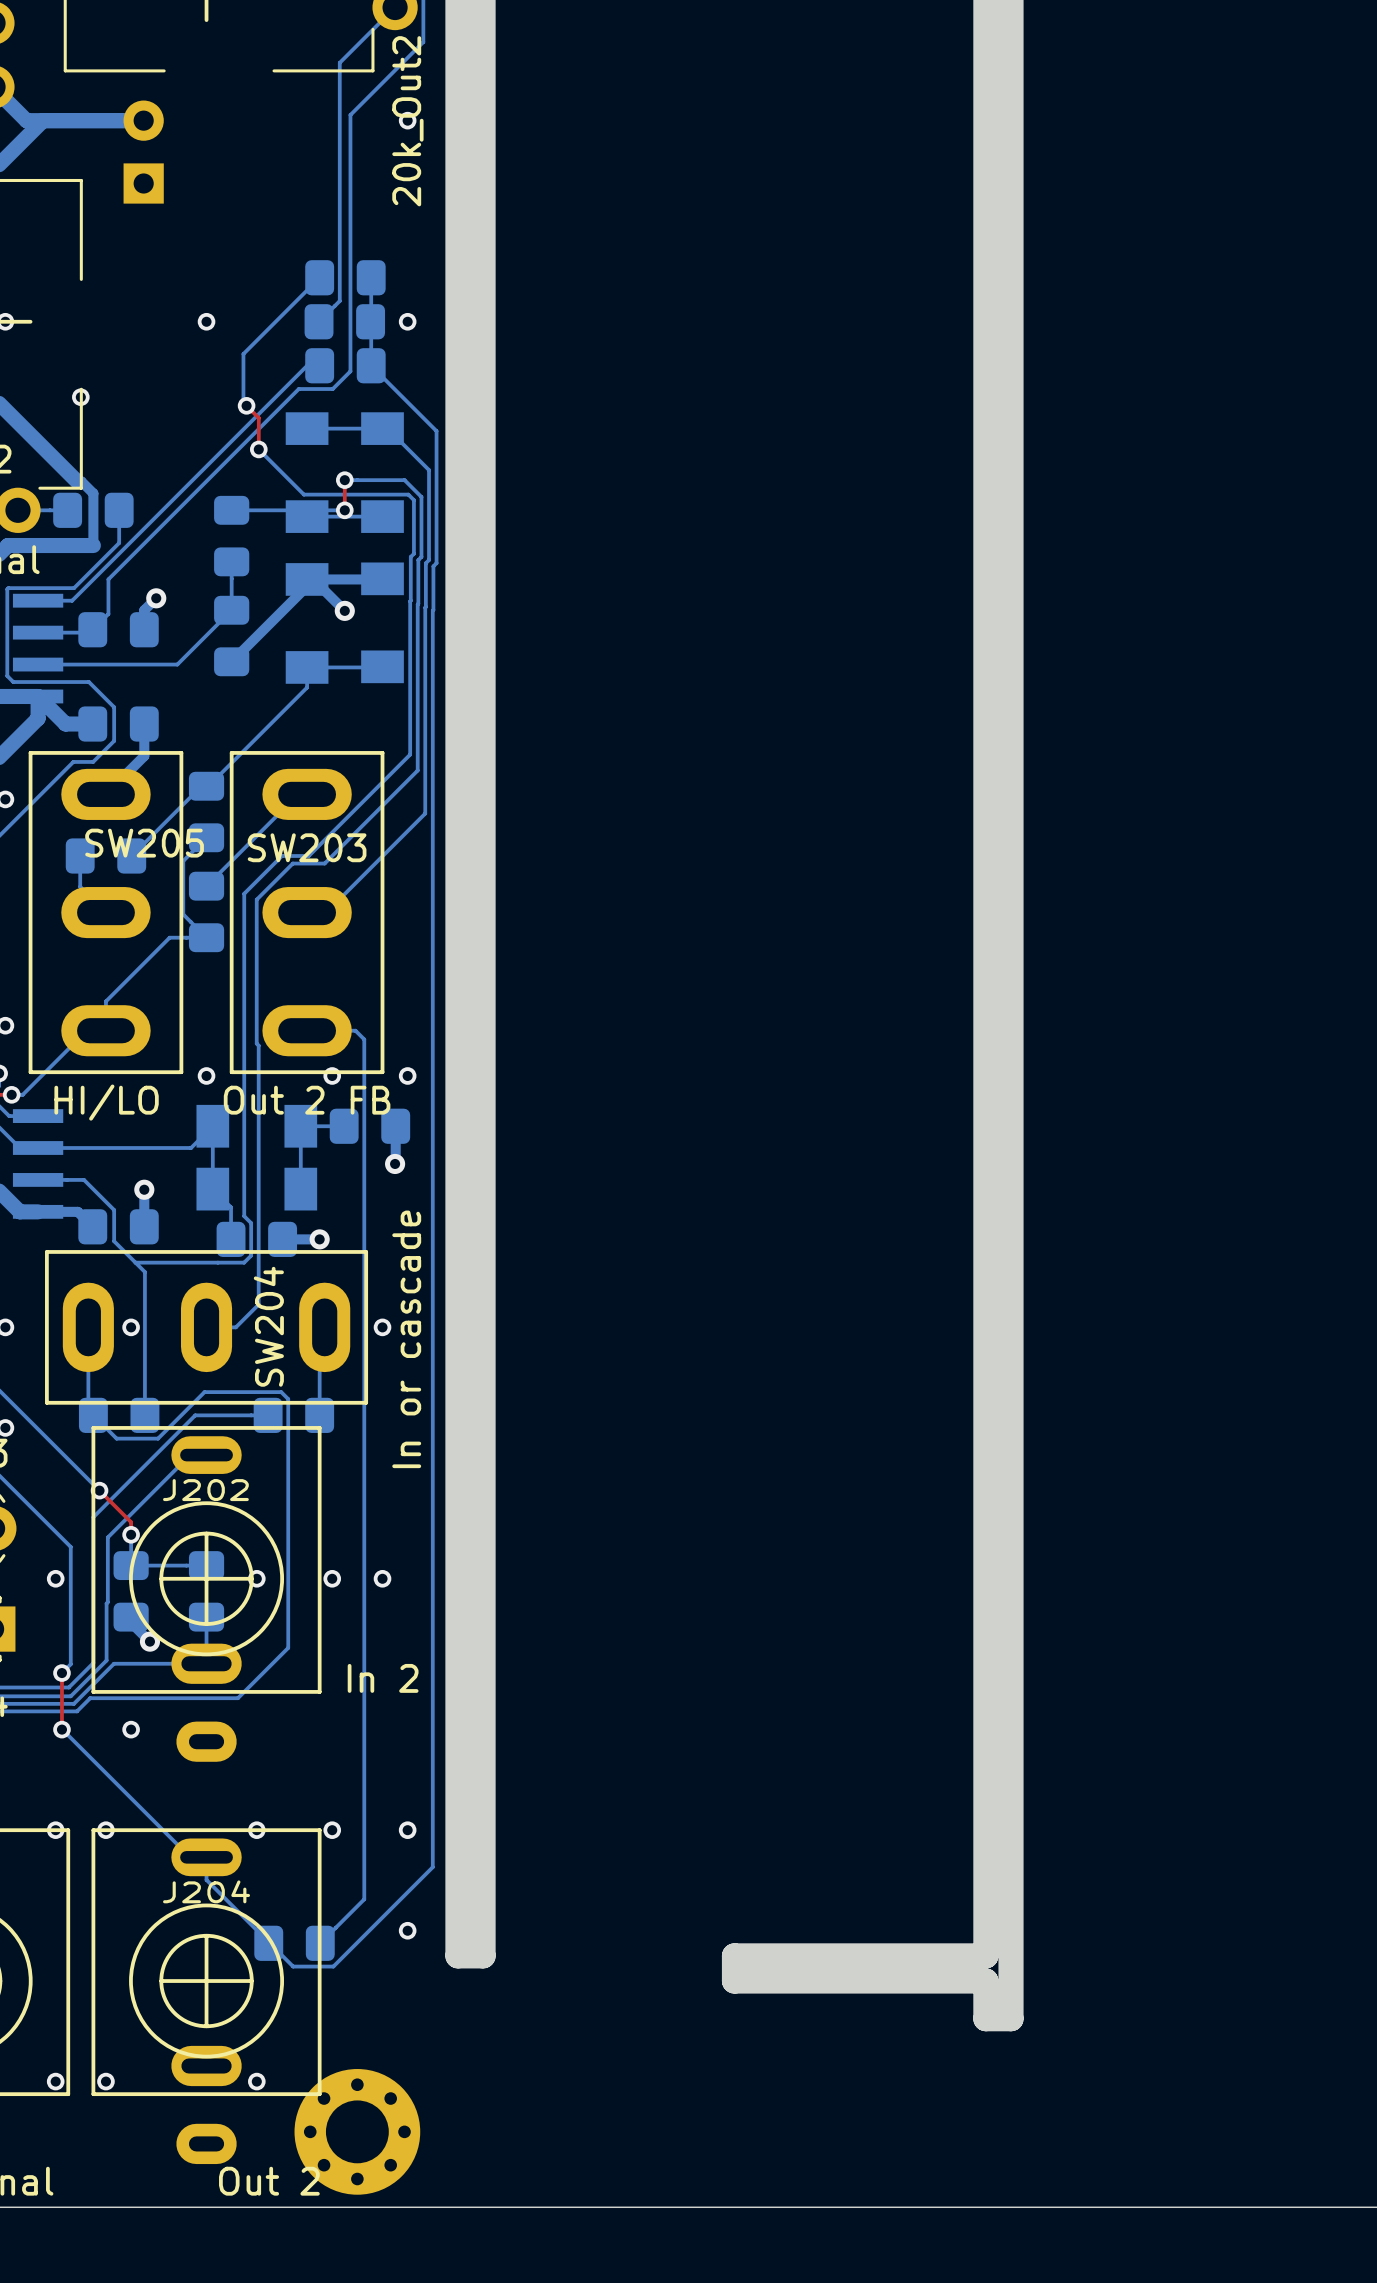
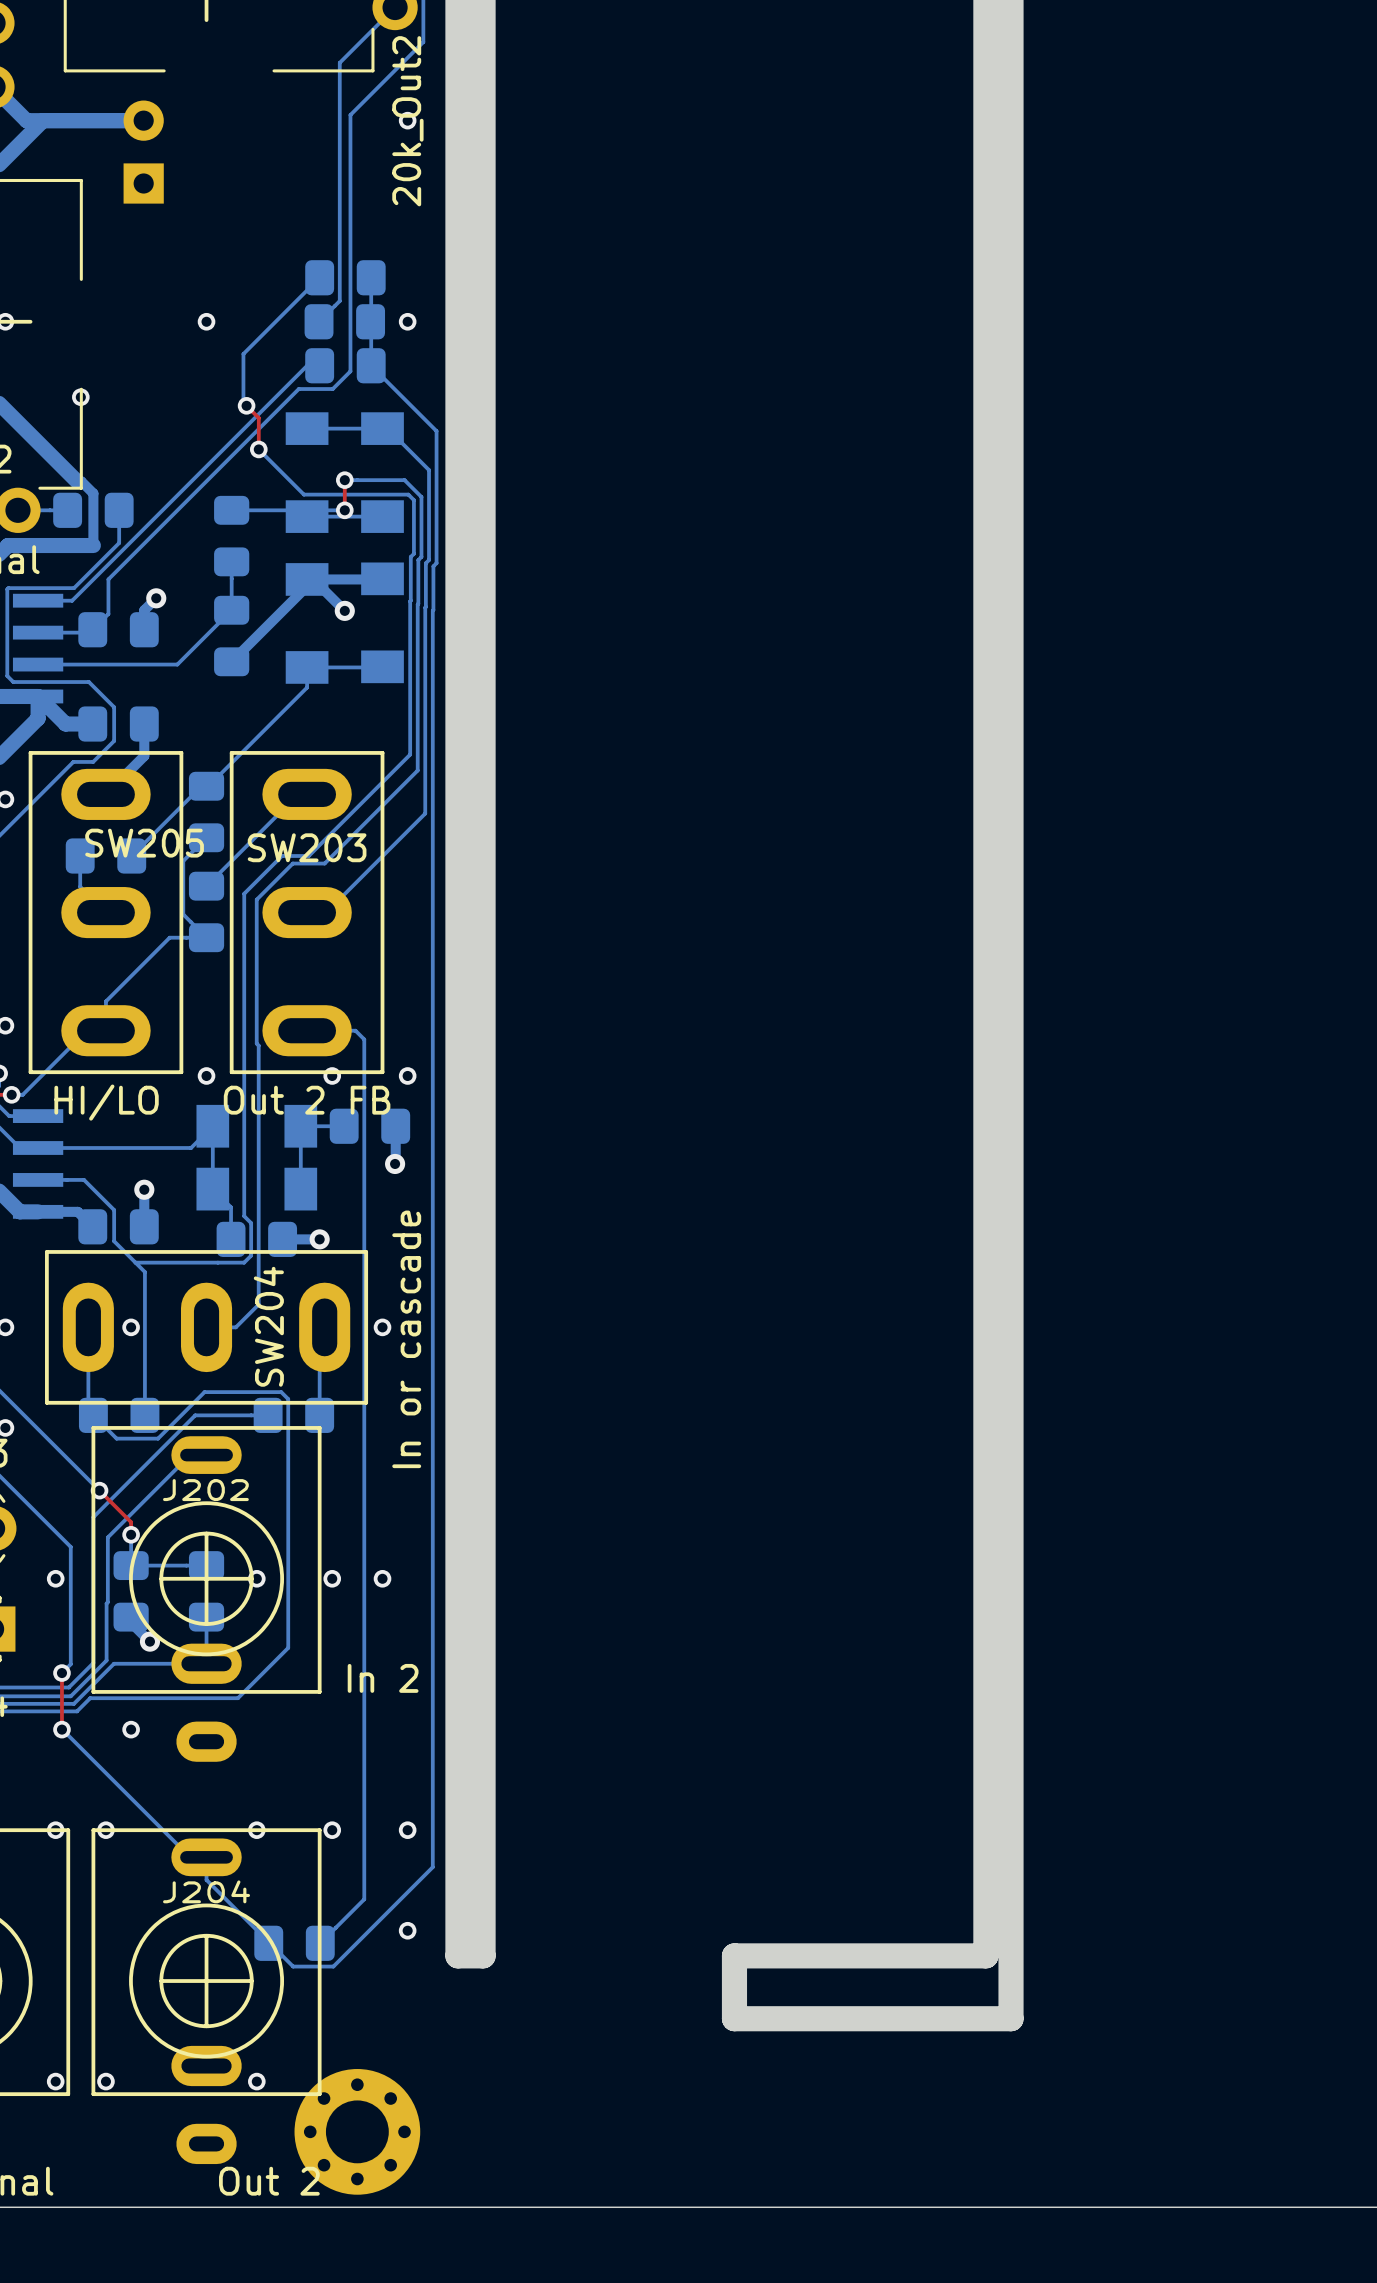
board edge: (734, 1981) (985, 1981) (985, 2018) -> (734, 1981) (734, 2018) (985, 2018)

